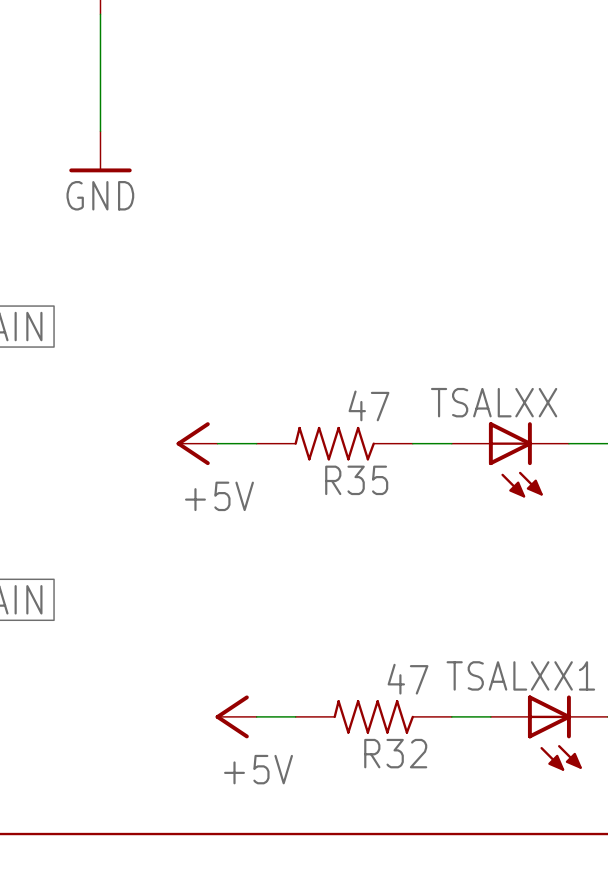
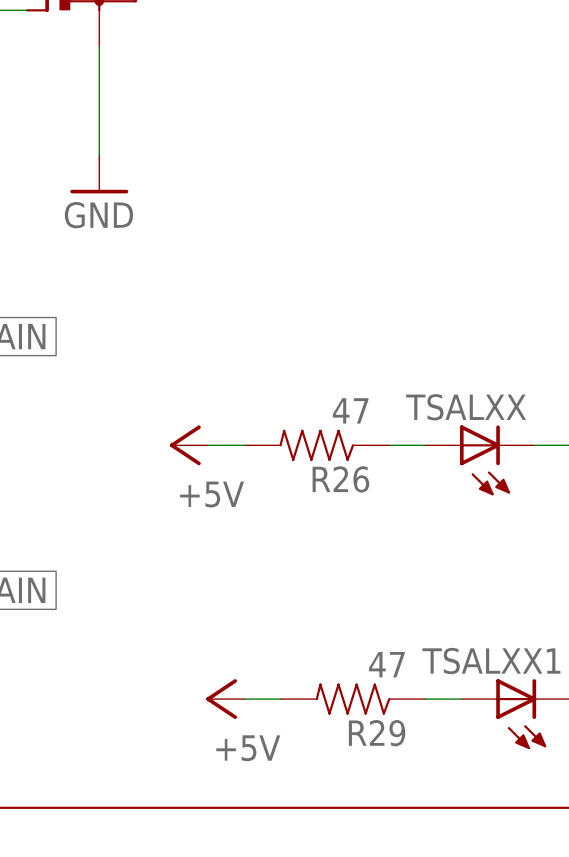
R35 name: R35 (356, 480) -> R26 (340, 479)
R32 name: R32 (395, 753) -> R29 (377, 733)

